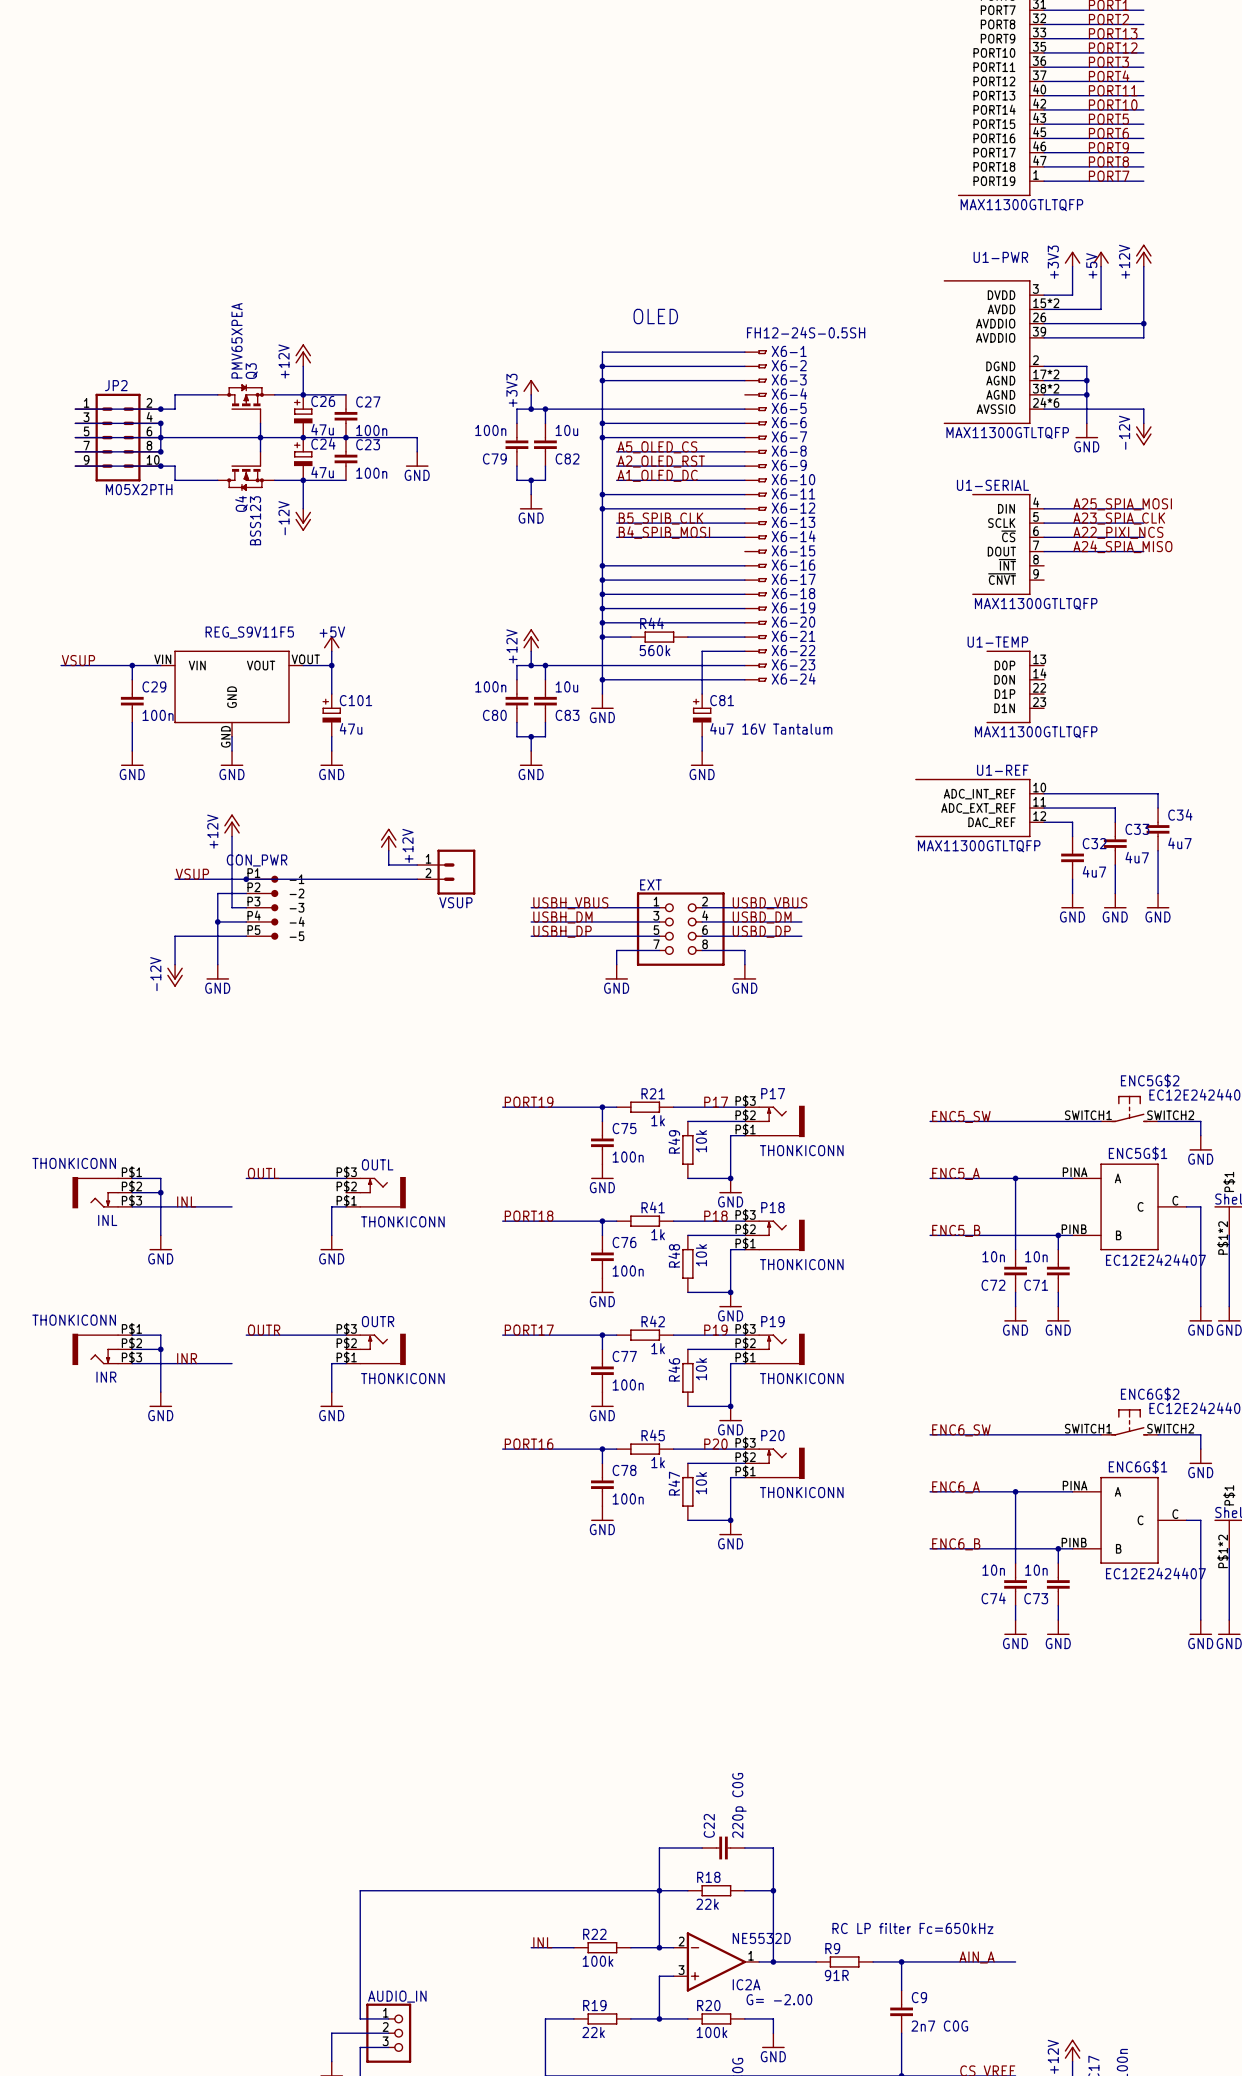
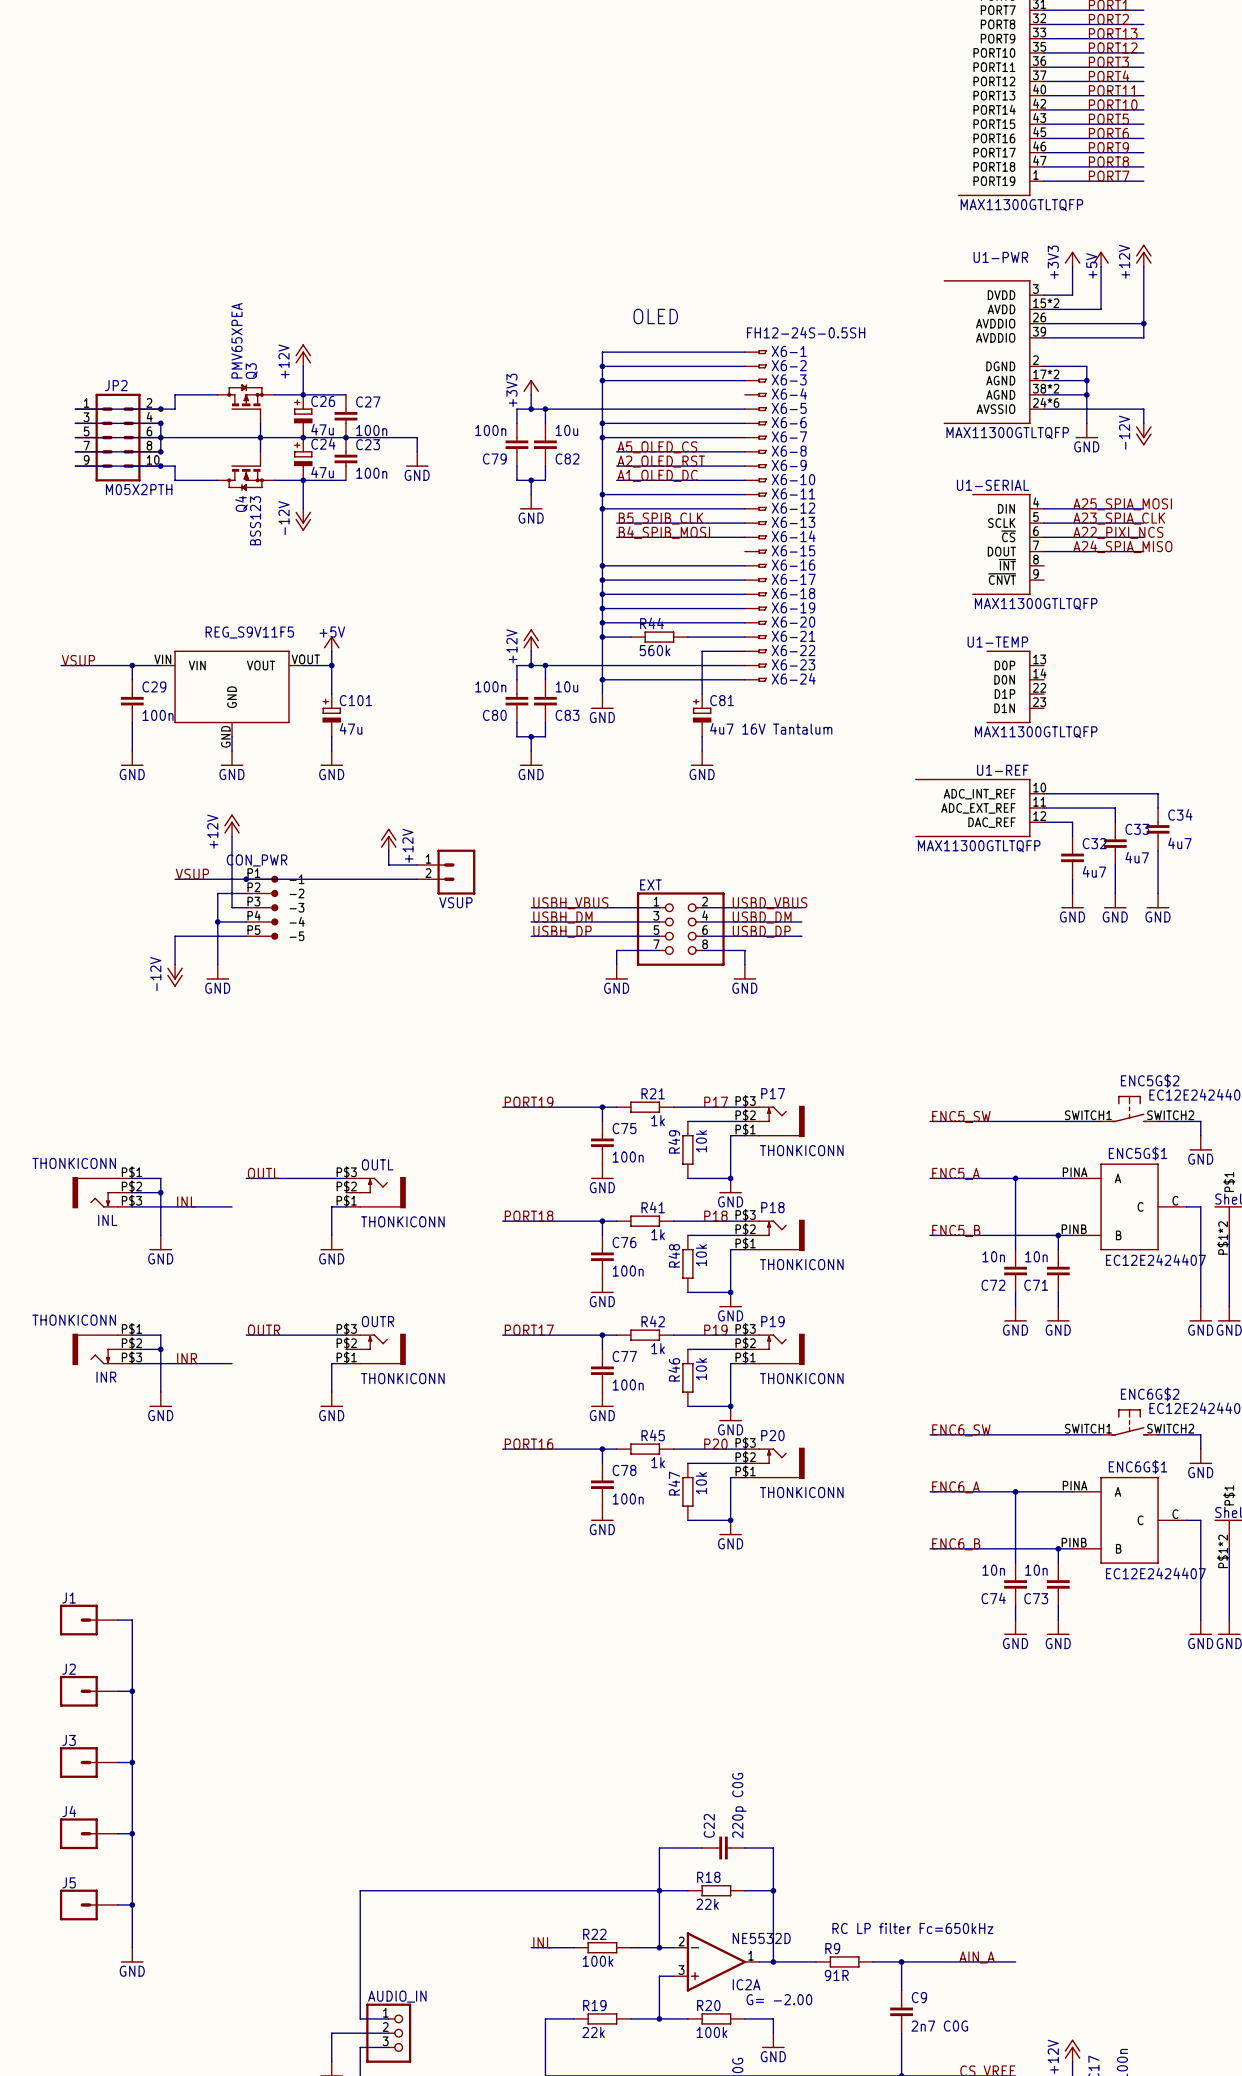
J1: none -> (88, 1620)
wire: none -> (118, 1620) (132, 1620) (132, 1947)
J2: none -> (88, 1691)
wire: none -> (118, 1691) (132, 1691)
junction: none -> (132, 1691)
J3: none -> (88, 1762)
wire: none -> (118, 1762) (132, 1762)
junction: none -> (132, 1762)
J4: none -> (88, 1833)
wire: none -> (118, 1833) (132, 1833)
junction: none -> (132, 1833)
J5: none -> (88, 1904)
wire: none -> (118, 1904) (132, 1904)
junction: none -> (132, 1904)
power symbol: none -> GND (132, 1955)

